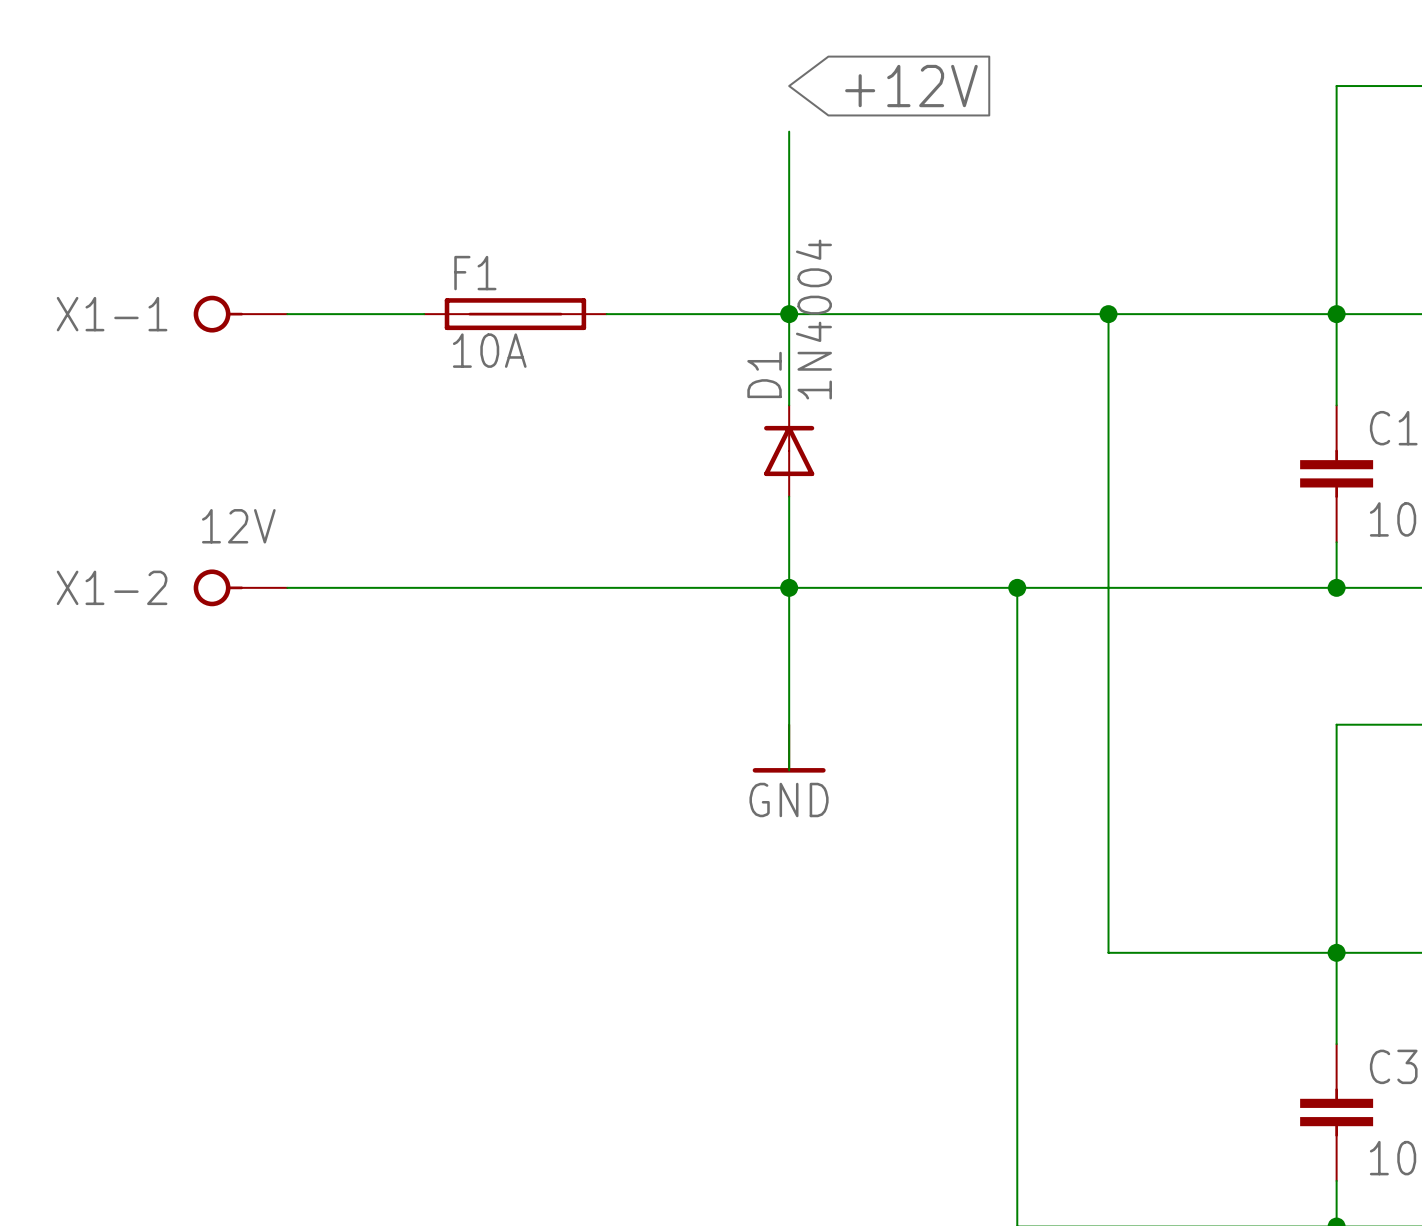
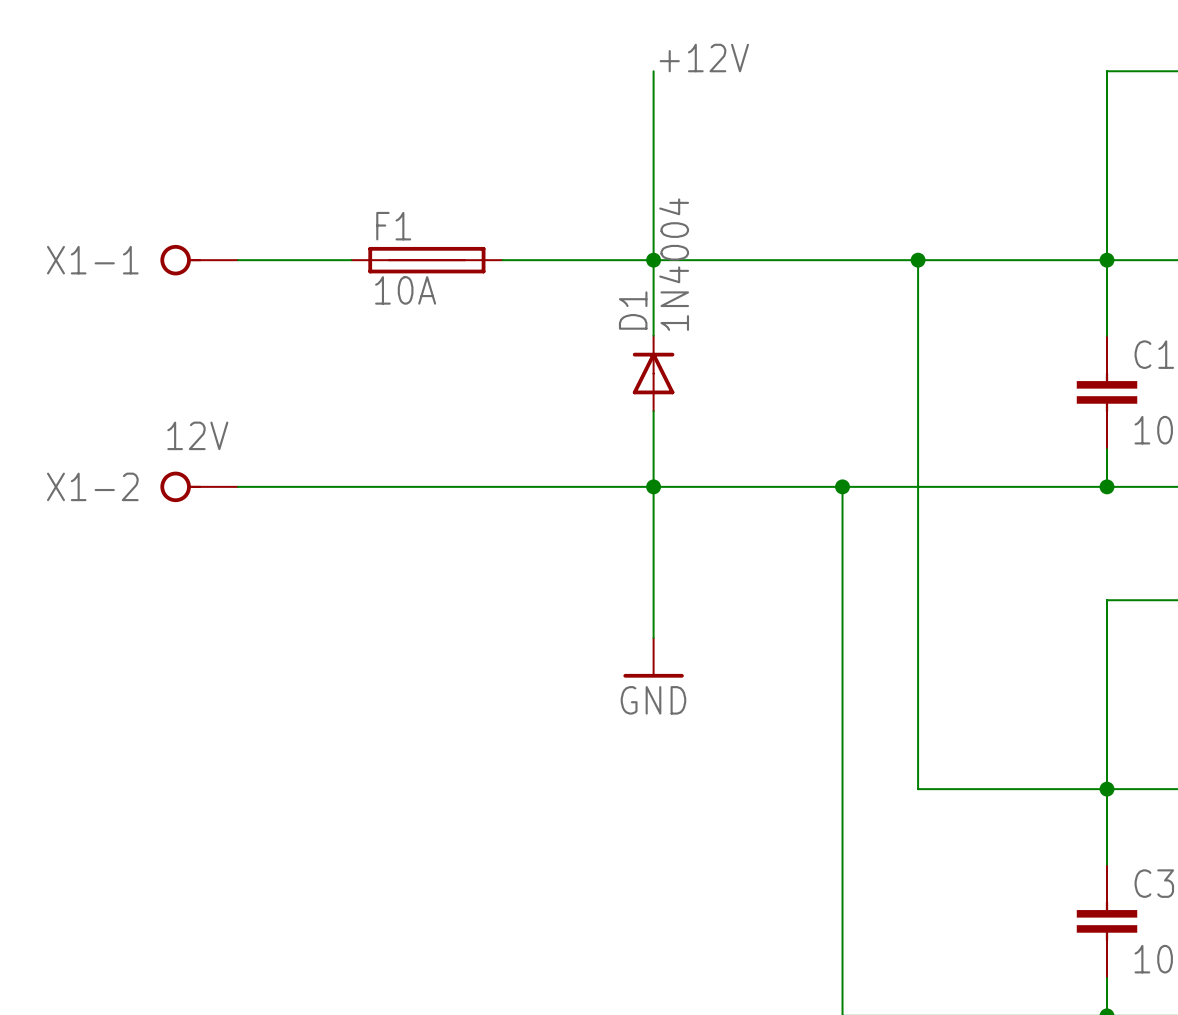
label: none -> +12V (704, 58)
wire: none -> (653, 71) (653, 109)
global label: +12V (911, 86) -> none
power symbol position: GND (789, 748) -> GND (653, 657)

